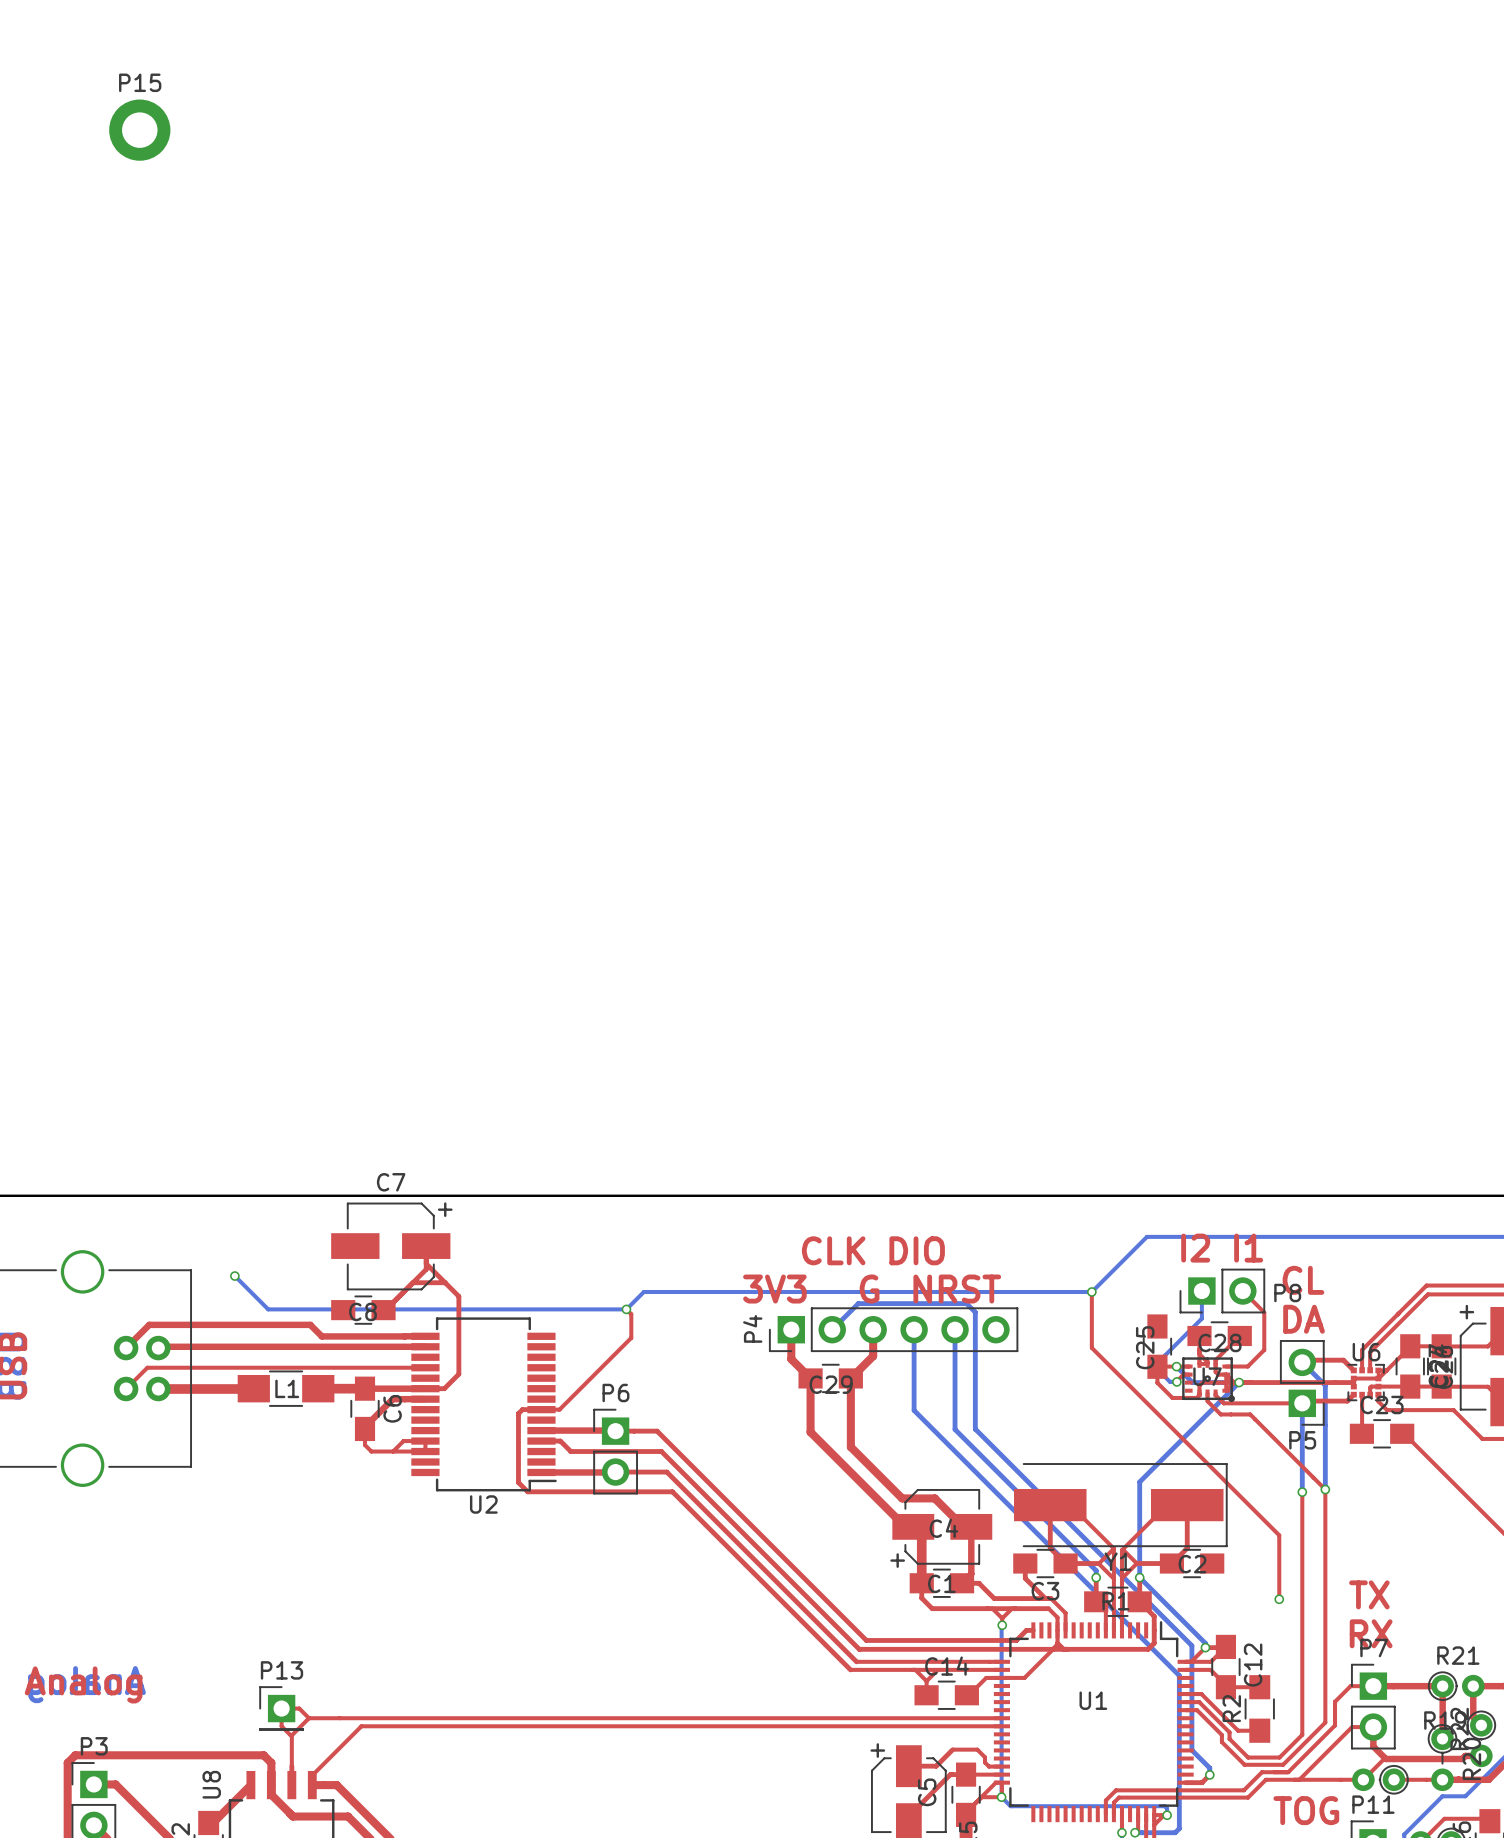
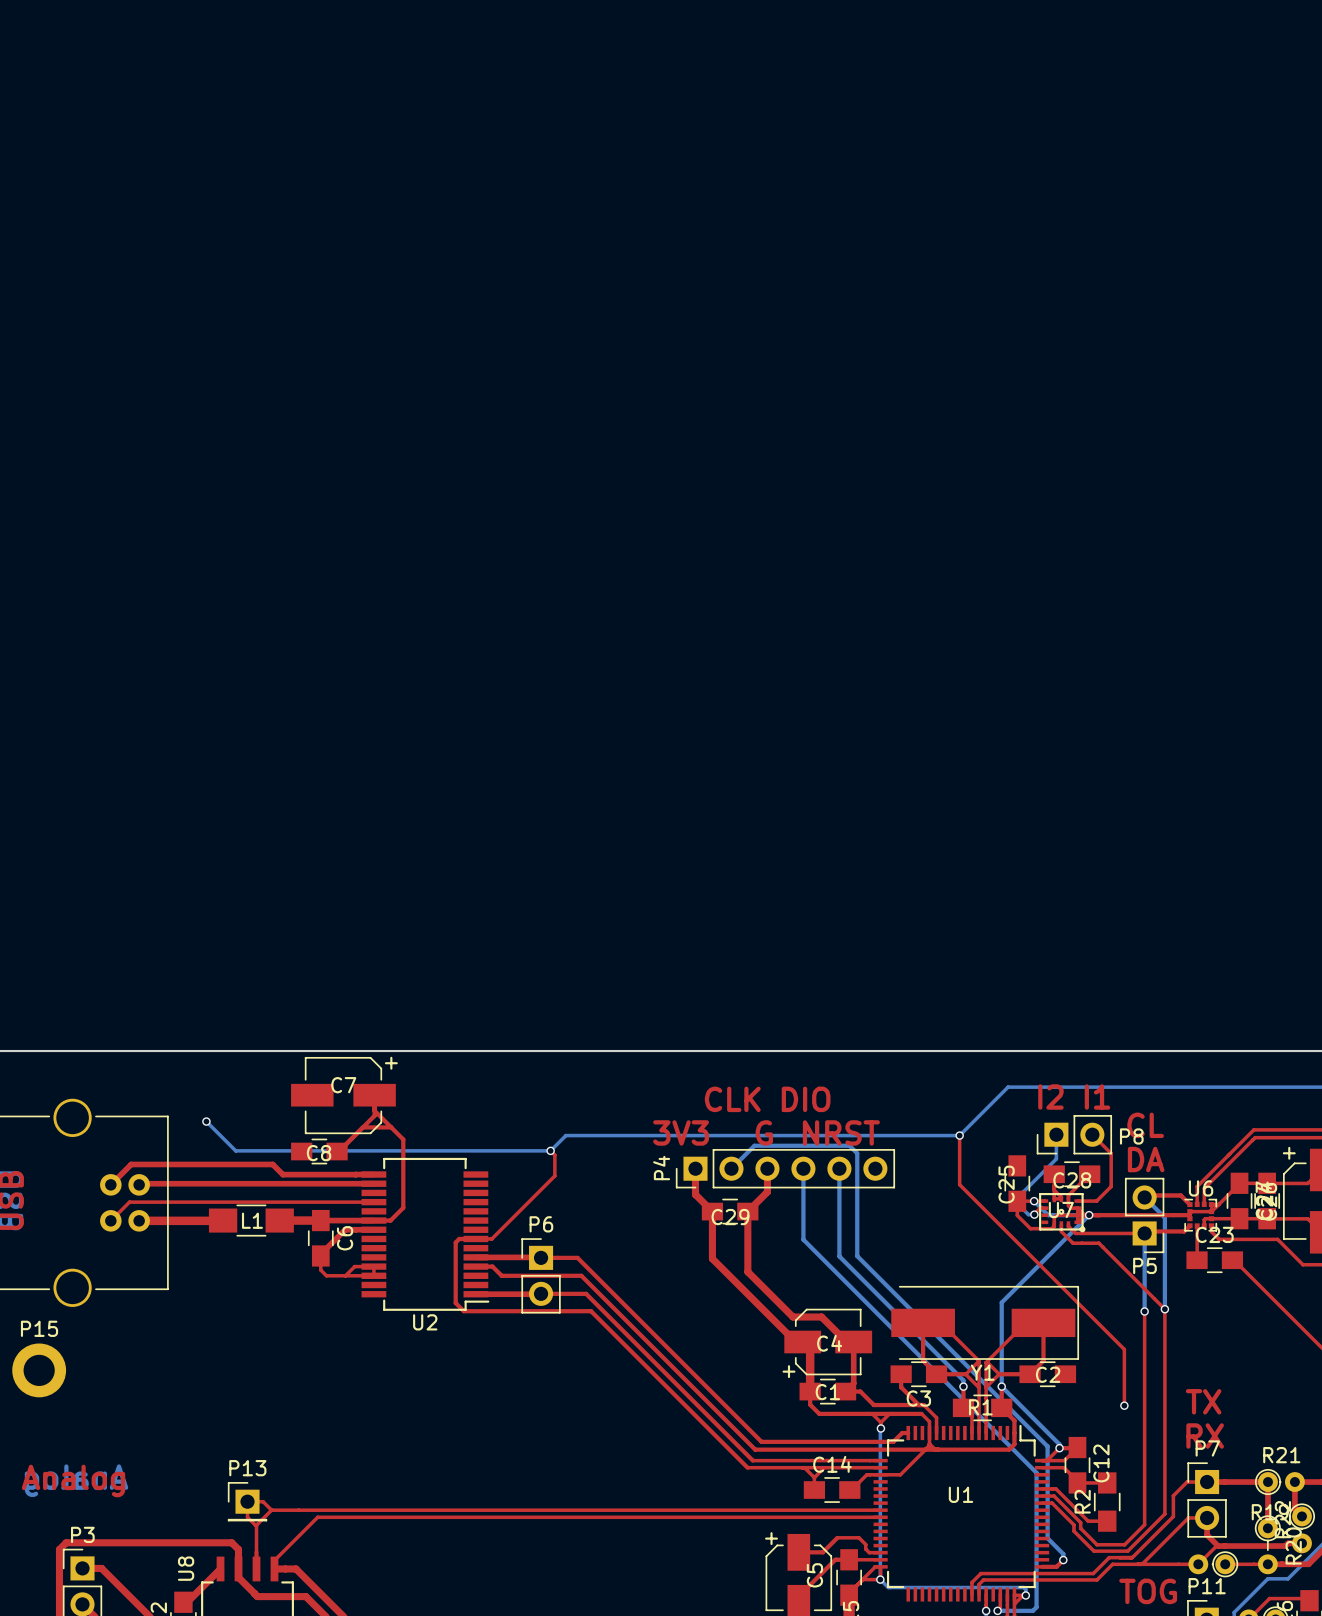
P15 position: (139, 130) -> (39, 1370)
C7 name position: C7 (391, 1182) -> C7 (343, 1085)

